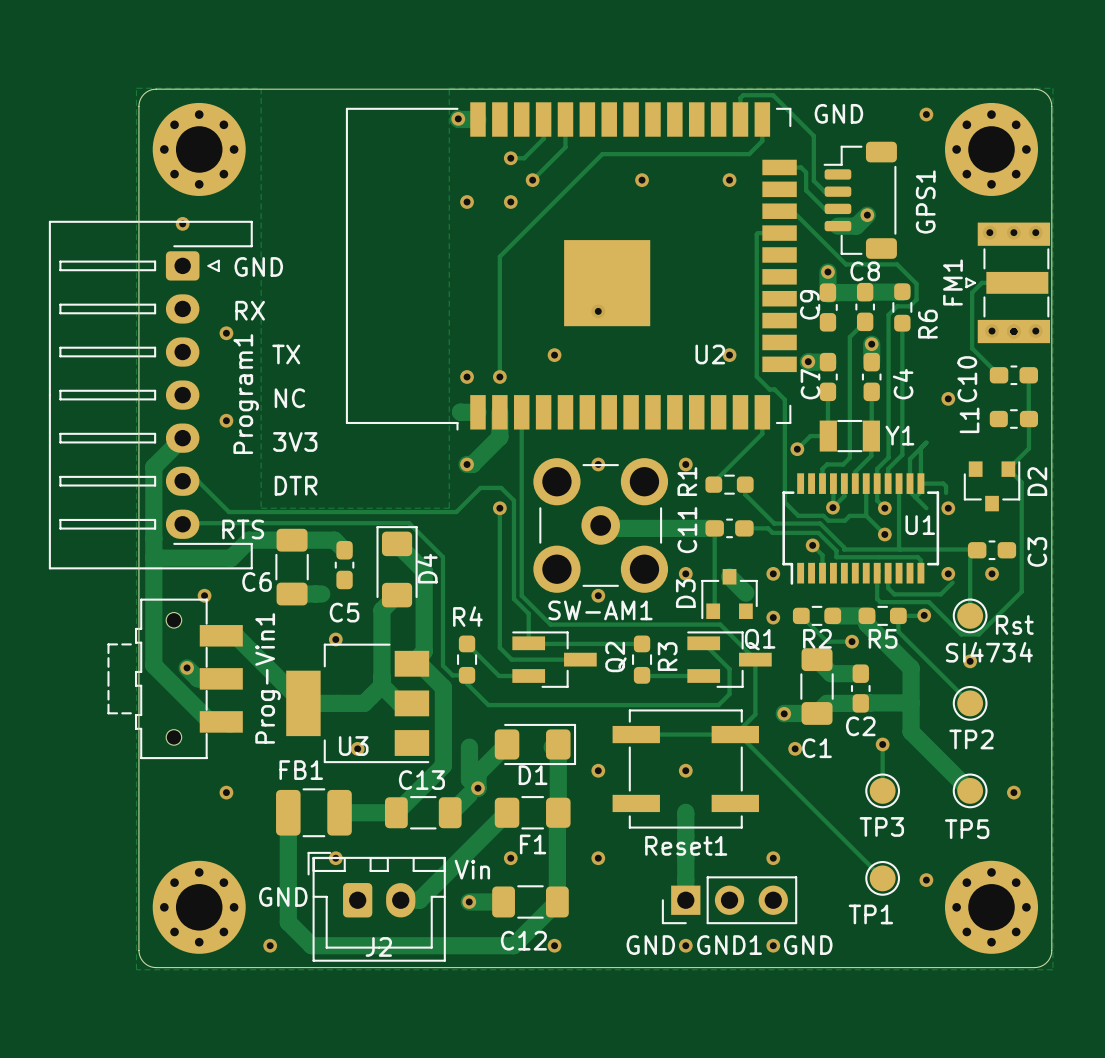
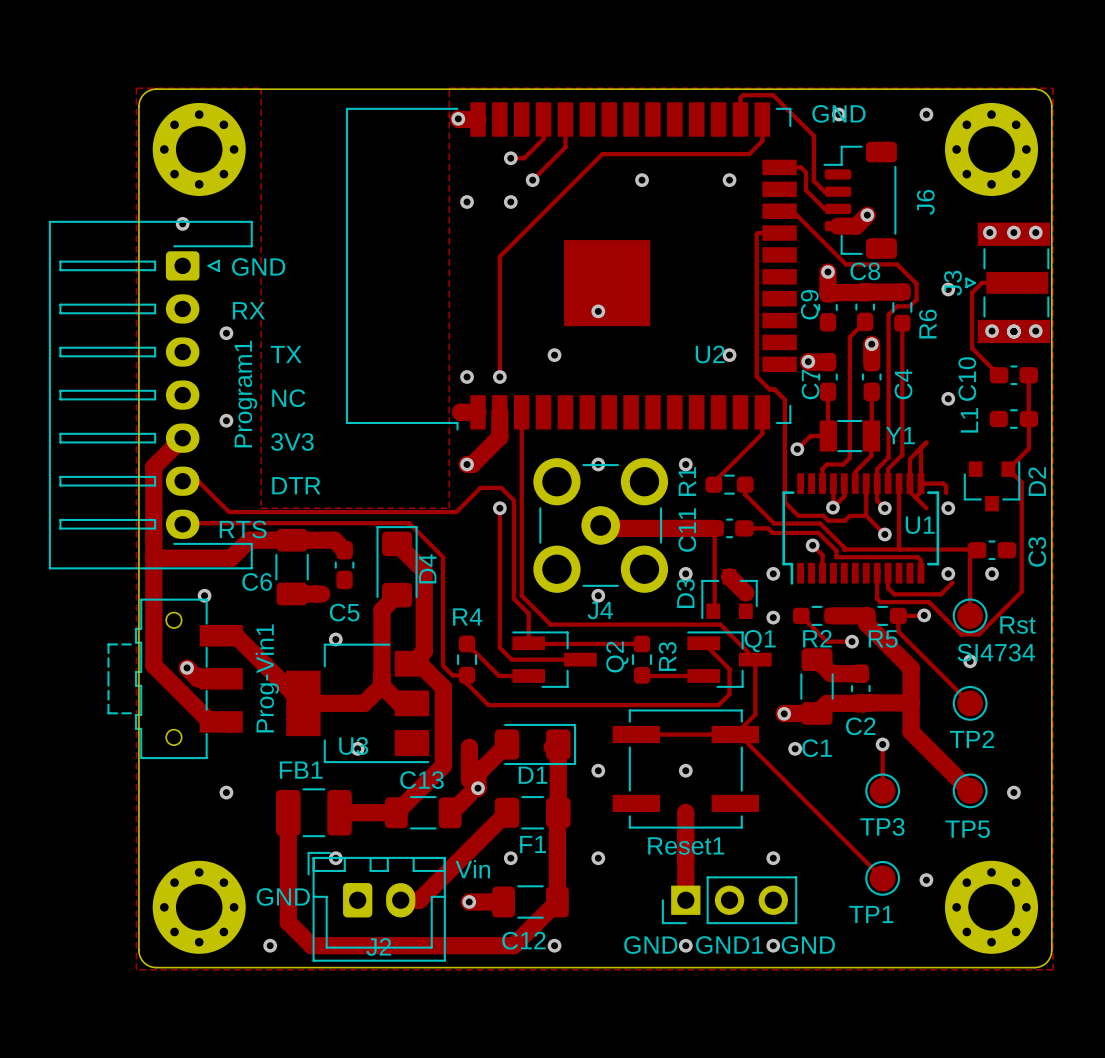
via: none -> (838, 114)
GPS1 name: GPS1 (925, 202) -> J6 (925, 202)
FM1 name: FM1 (952, 282) -> J3 (952, 283)
via: none -> (948, 289)
SW-AM1 name: SW-AM1 (600, 610) -> J4 (600, 610)

